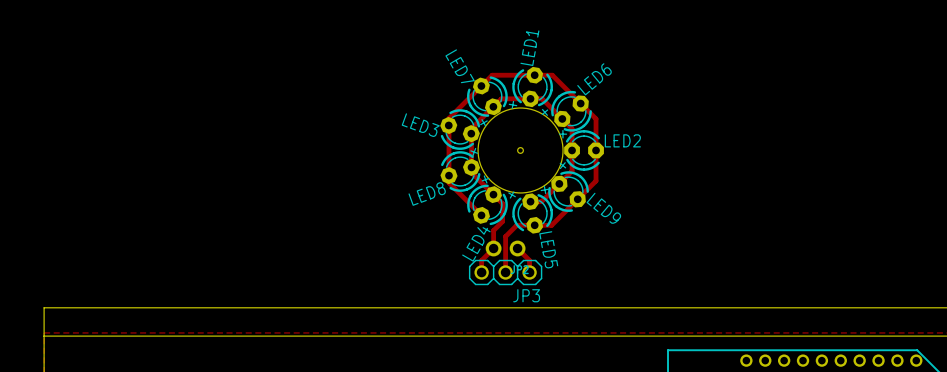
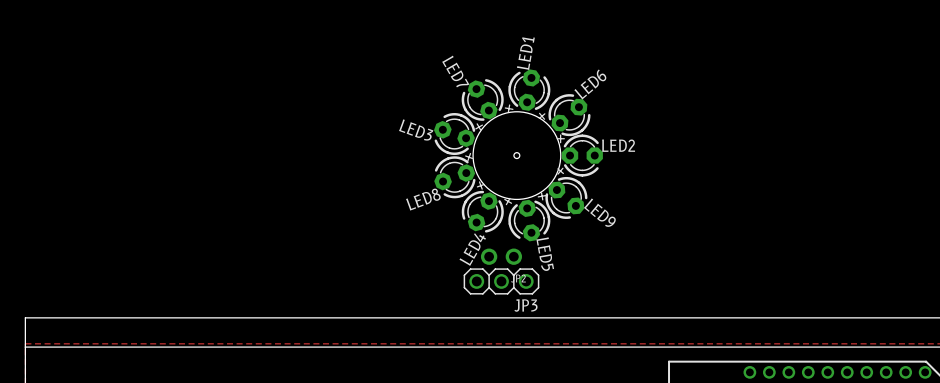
track: (530, 201) (541, 201) (572, 171) (572, 128) (542, 98) (501, 98) (471, 128) (471, 172) (502, 203) (502, 221) (493, 230) (493, 248) (481, 260) (481, 272) -> none
track: (481, 215) (448, 182) (448, 118) (492, 75) (552, 75) (596, 118) (596, 180) (551, 225) (516, 225) (505, 236) (505, 272) -> none
track: (517, 248) (529, 260) (529, 272) -> none

